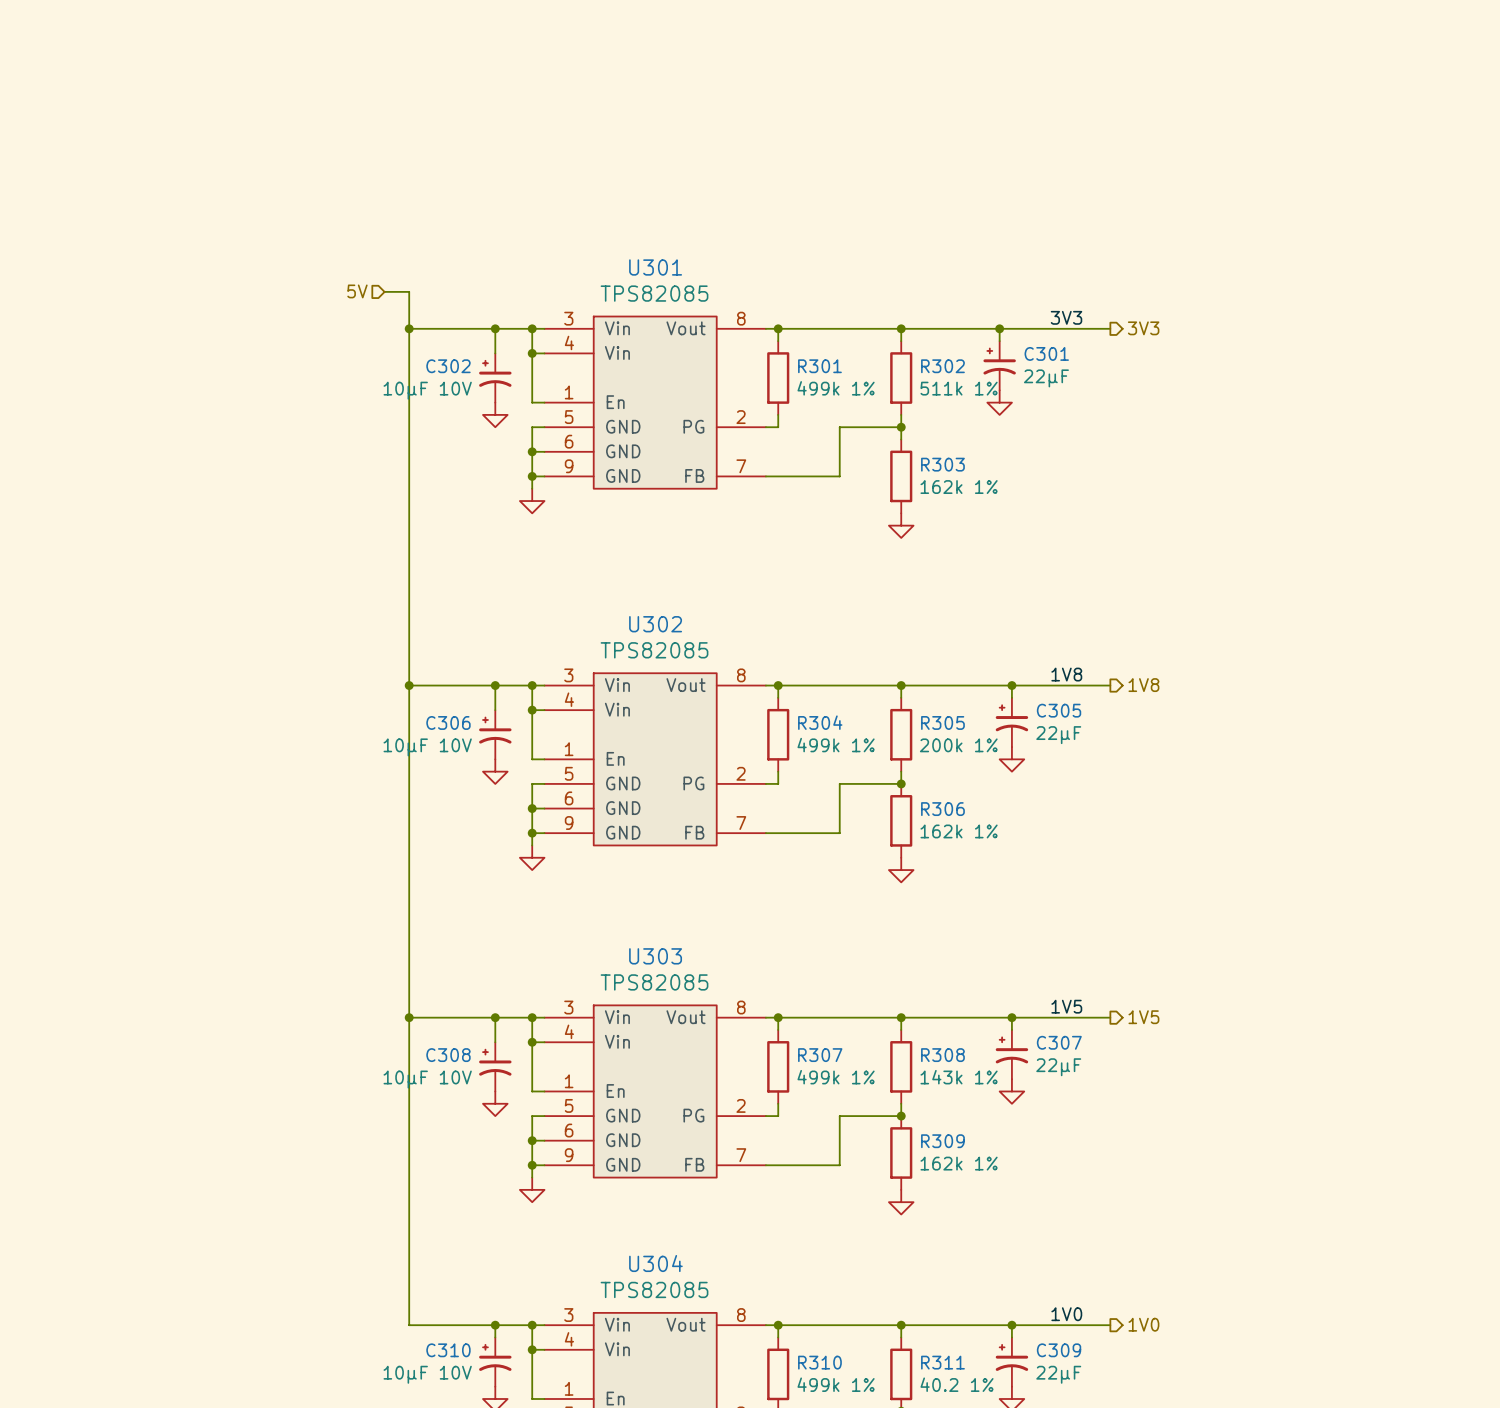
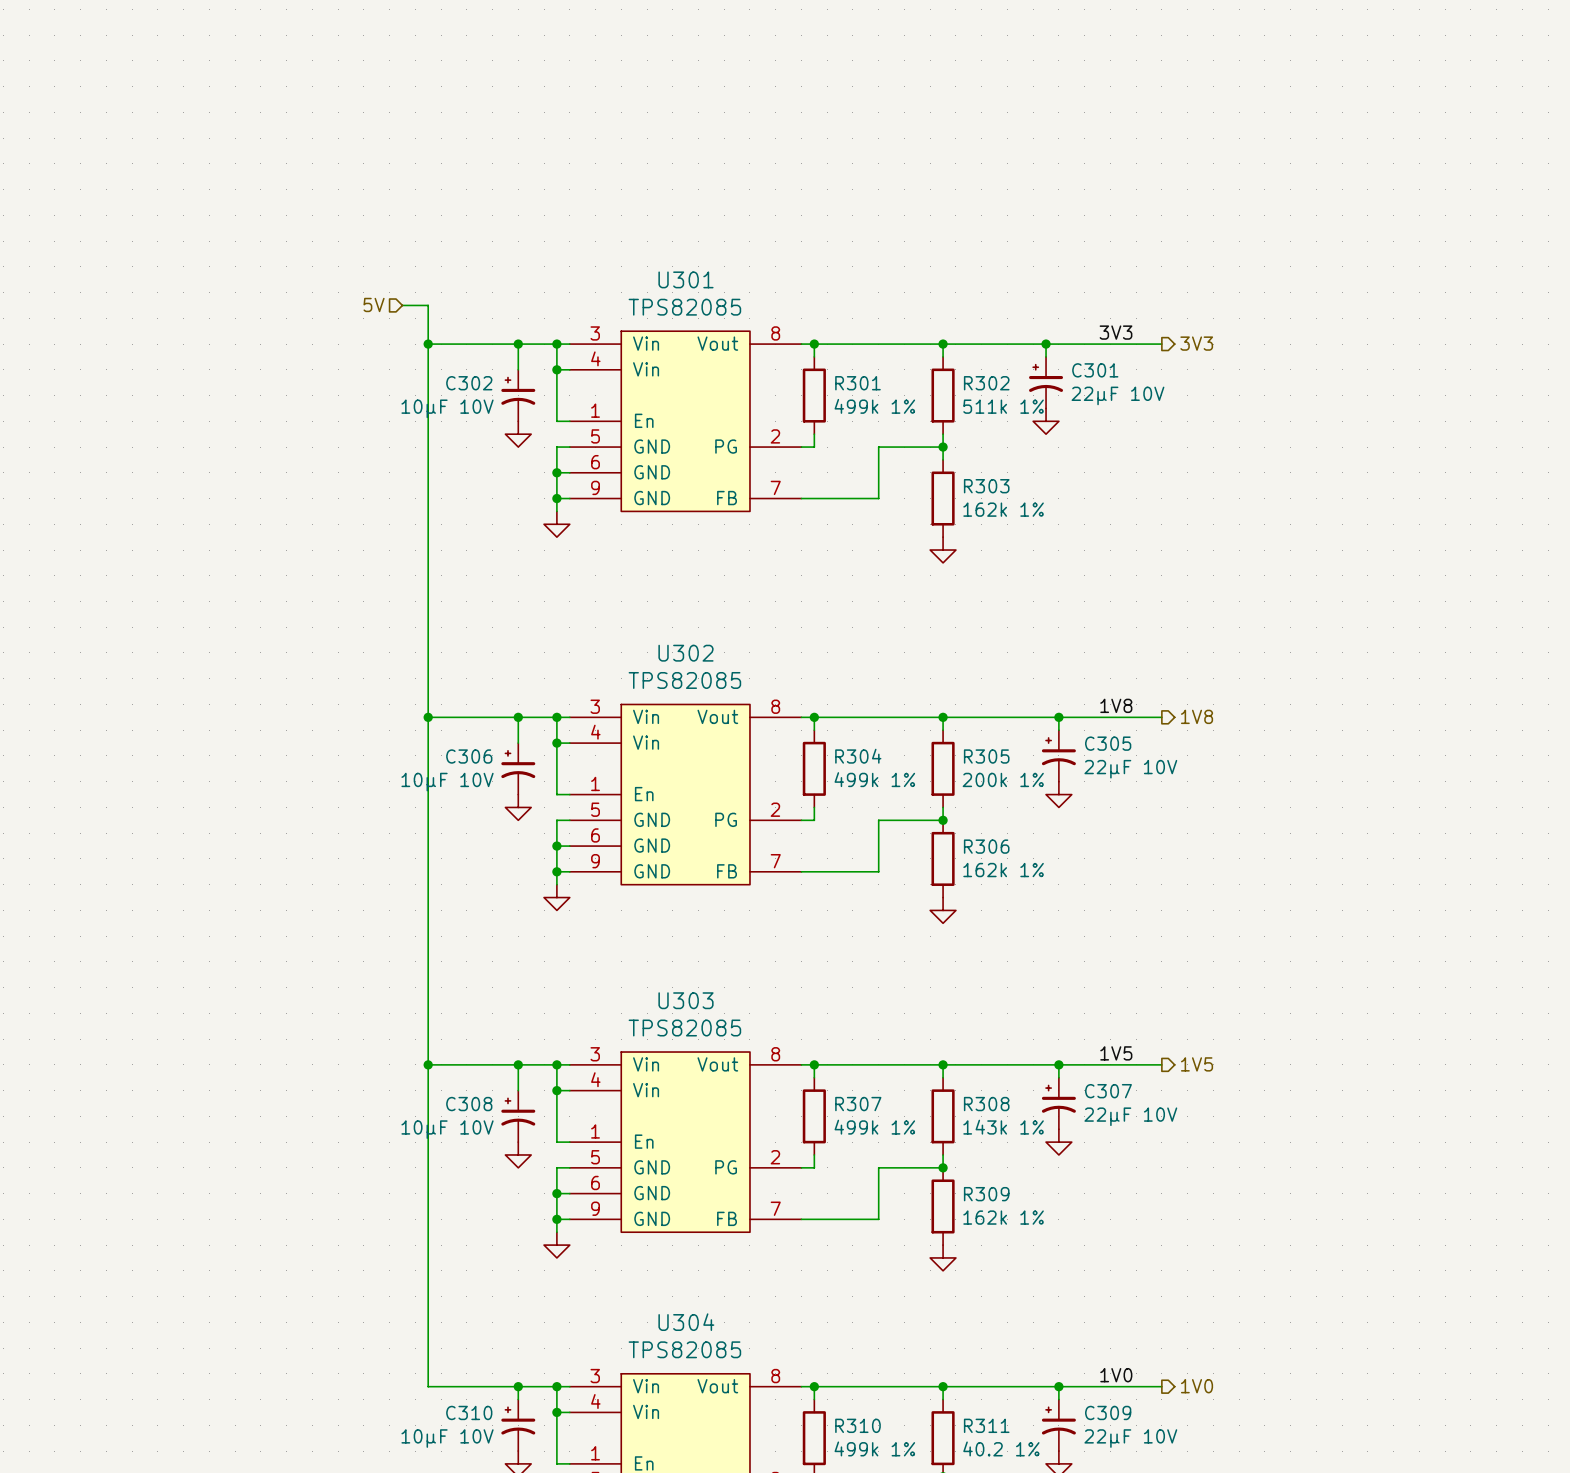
C301 value: 22µF (1046, 378) -> 22µF 10V (1117, 395)
C305 value: 22µF (1058, 735) -> 22µF 10V (1130, 769)
C307 value: 22µF (1058, 1067) -> 22µF 10V (1130, 1116)
C309 value: 22µF (1058, 1374) -> 22µF 10V (1130, 1438)

